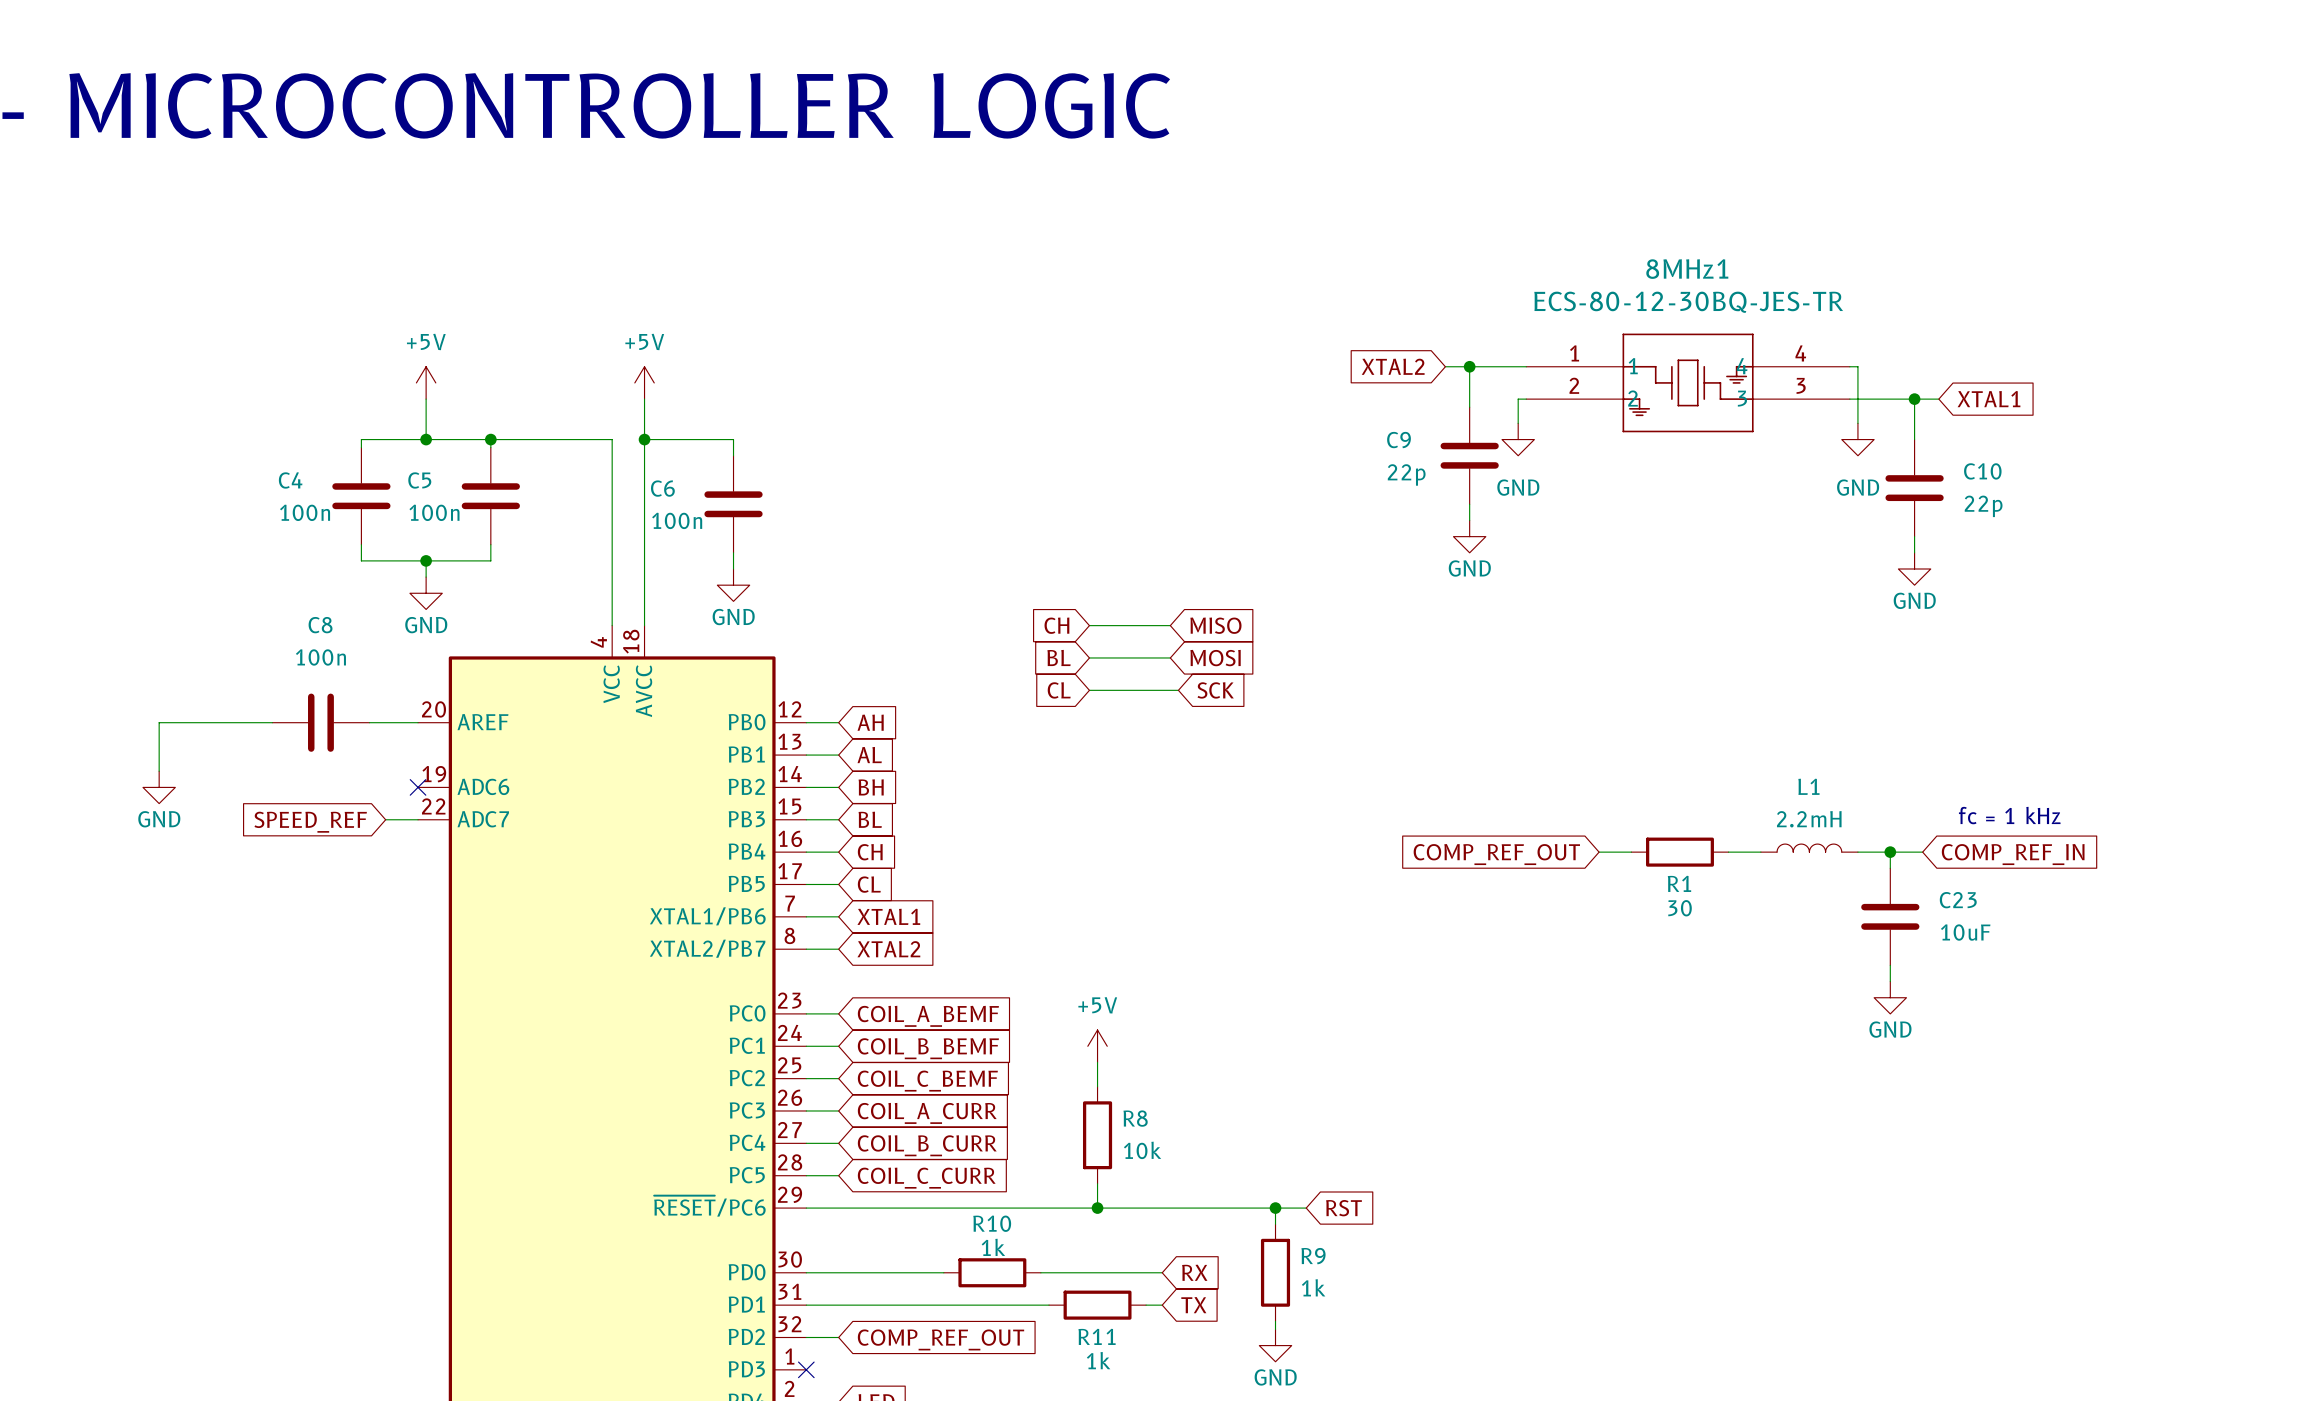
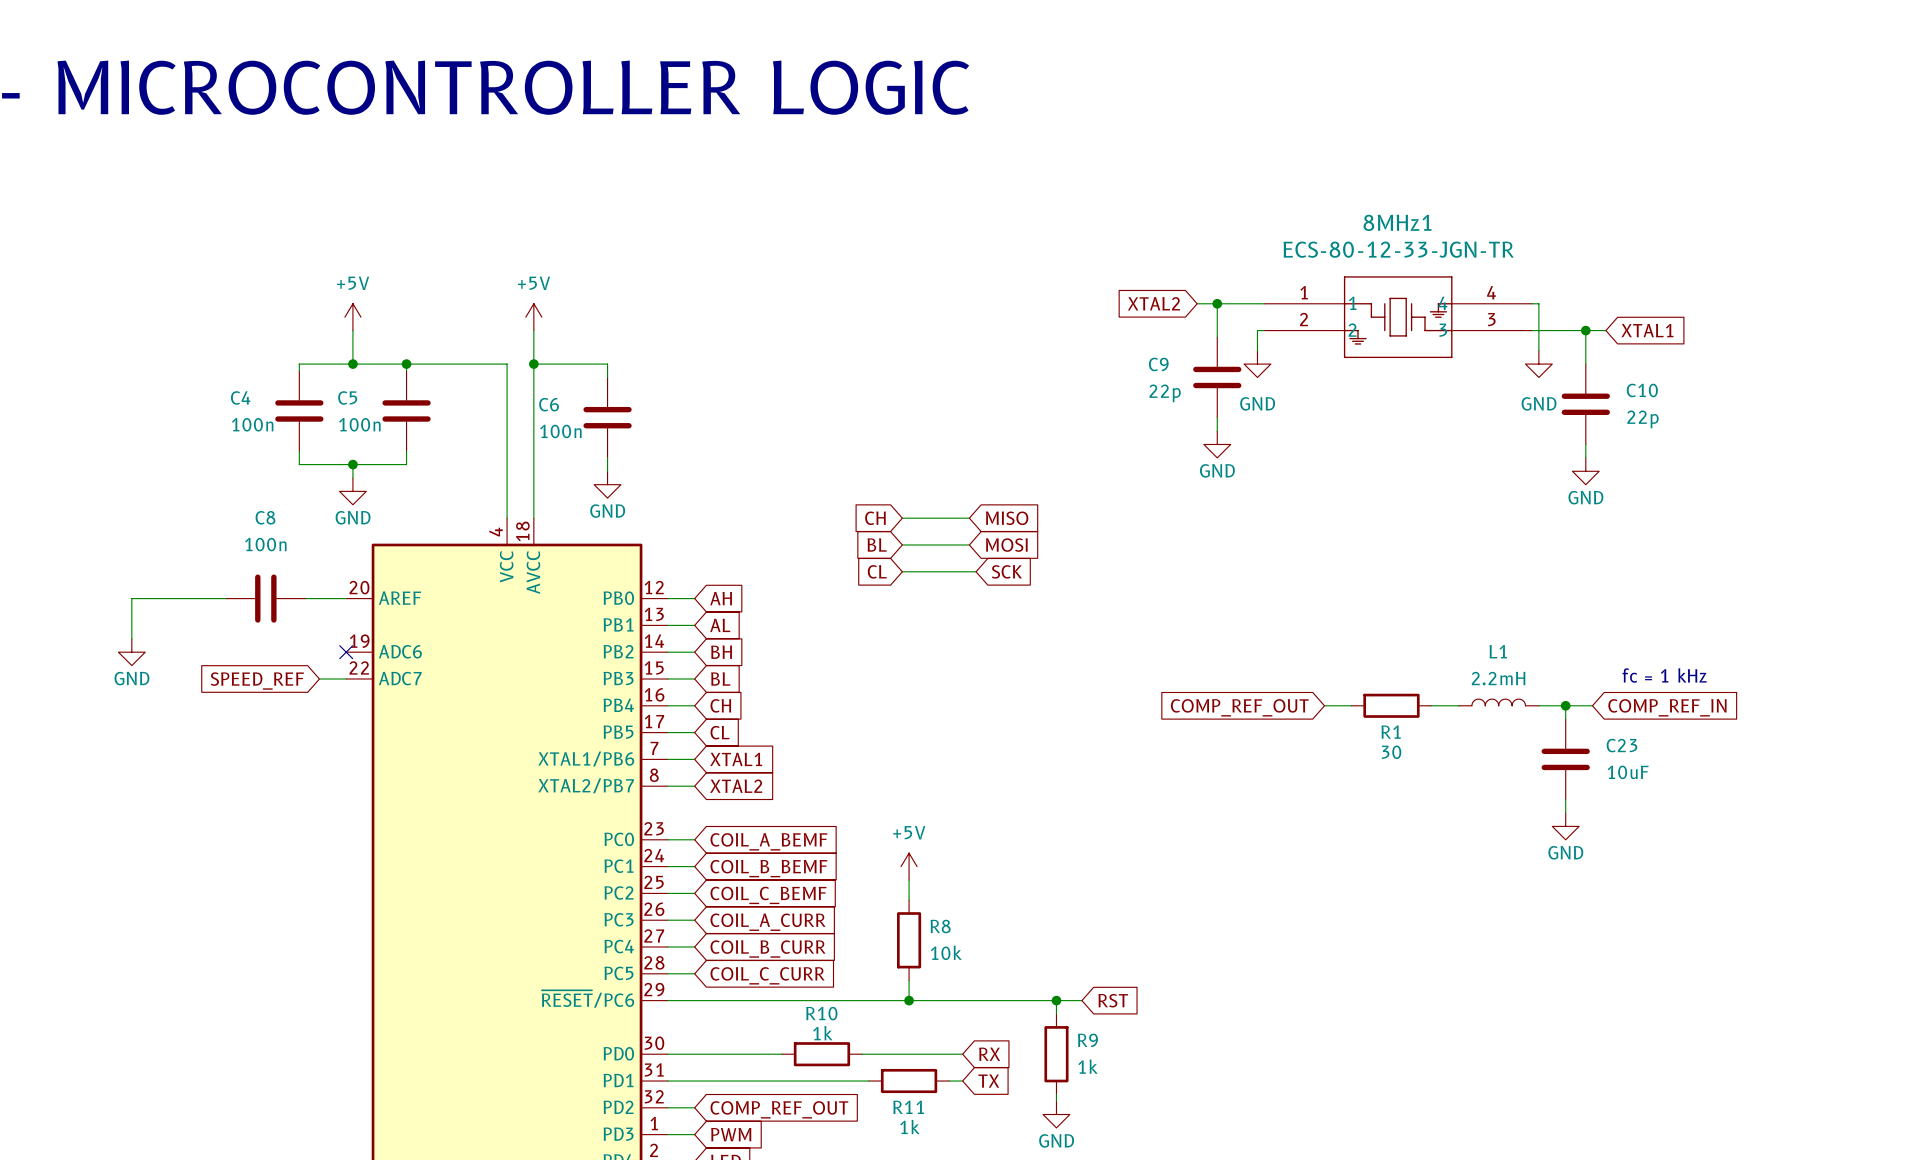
8MHz1 value: ECS-80-12-30BQ-JES-TR (1688, 302) -> ECS-80-12-33-JGN-TR (1398, 249)
wire: none -> (667, 1134) (694, 1134)
no-connect mark: (806, 1369) -> none
global label: none -> PWM (731, 1134)

